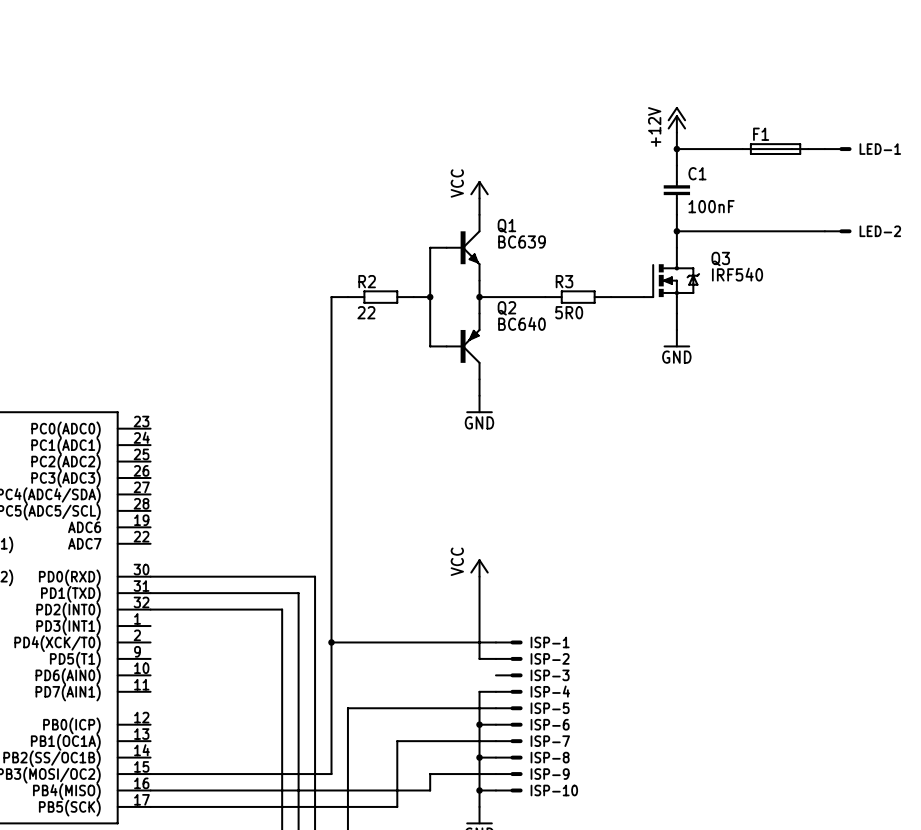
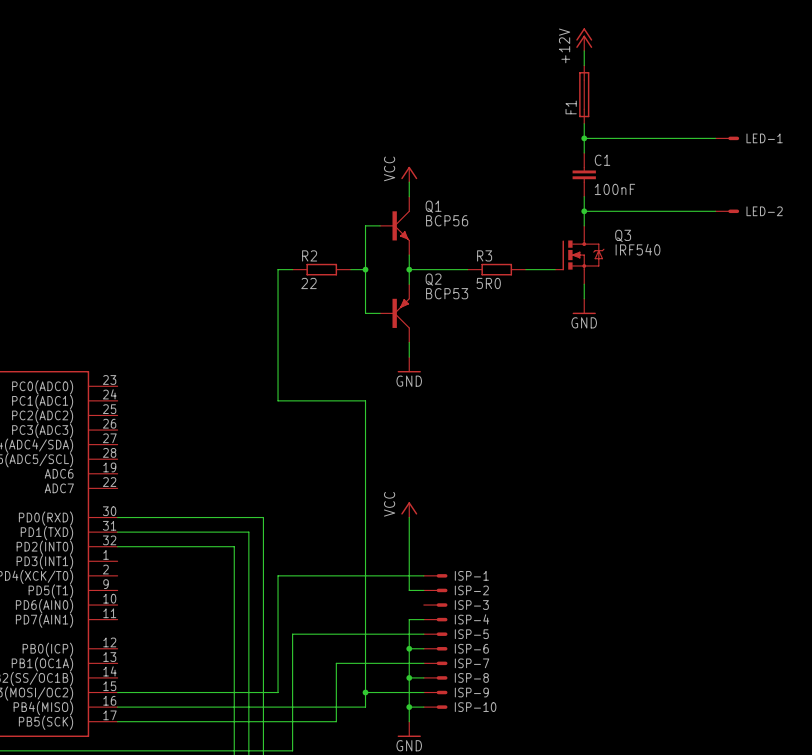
wire: none -> (584, 50) (584, 65)
power symbol position: +12V (676, 119) -> +12V (584, 39)
F1 name position: F1 (761, 134) -> F1 (571, 107)
F1 rotation: 0° (775, 149) -> 90° clockwise (584, 94)
F1 position: (775, 149) -> (584, 94)
Q1 value: BC639 (521, 241) -> BCP56 (447, 220)
Q2 value: BC640 (521, 323) -> BCP53 (447, 293)
wire: (331, 445) (331, 642) -> (278, 400) (365, 400) (365, 692)
junction: (331, 642) -> none
junction: none -> (365, 692)

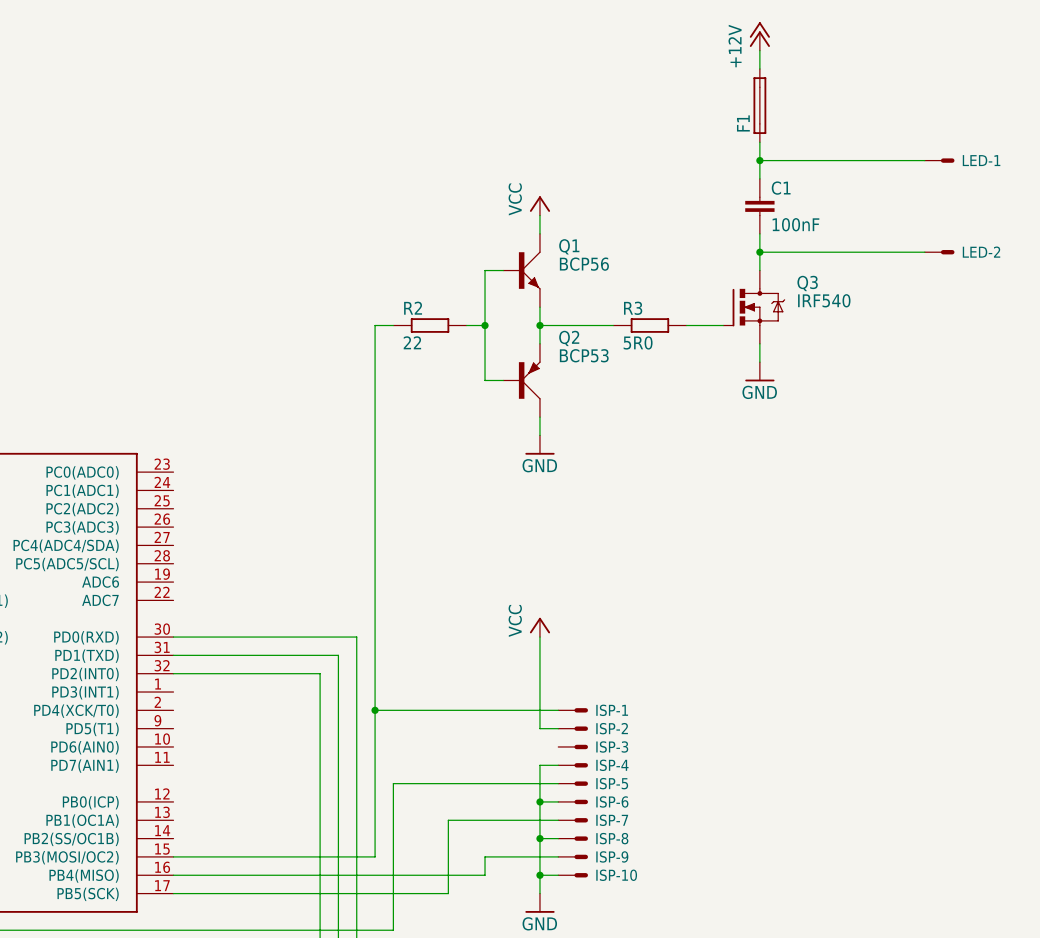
wire: (278, 400) (365, 400) (365, 692) -> (375, 490) (375, 710)
junction: none -> (375, 710)
junction: (365, 692) -> none

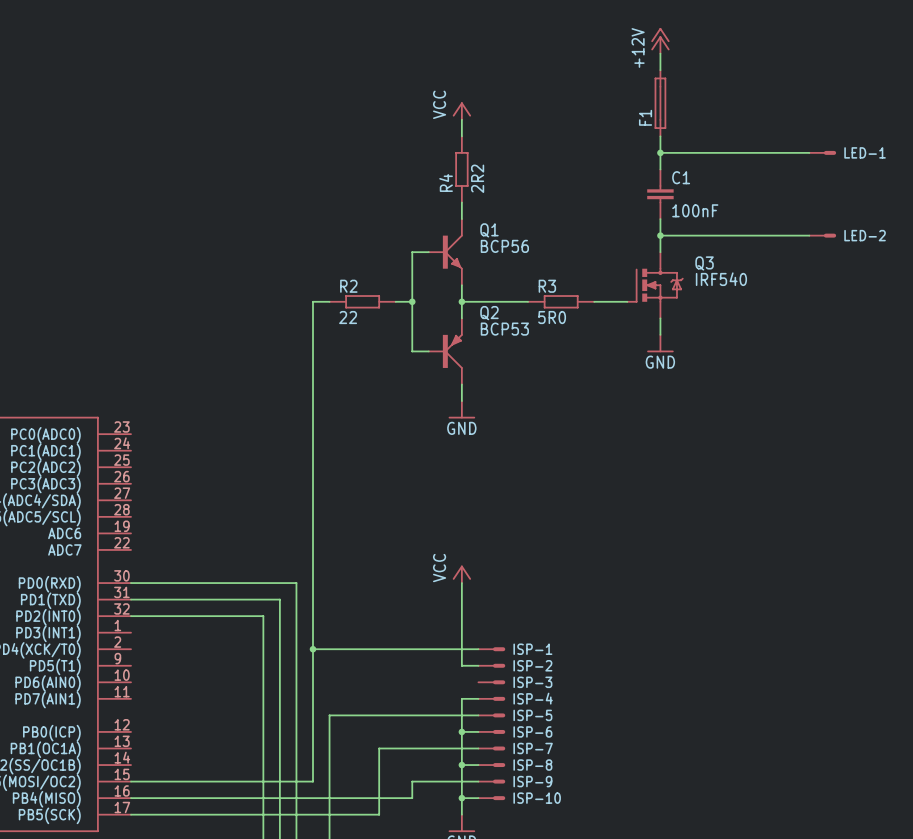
wire: none -> (461, 119) (461, 136)
R4: none -> 2R2 (461, 169)
power symbol position: VCC (539, 205) -> VCC (461, 111)

